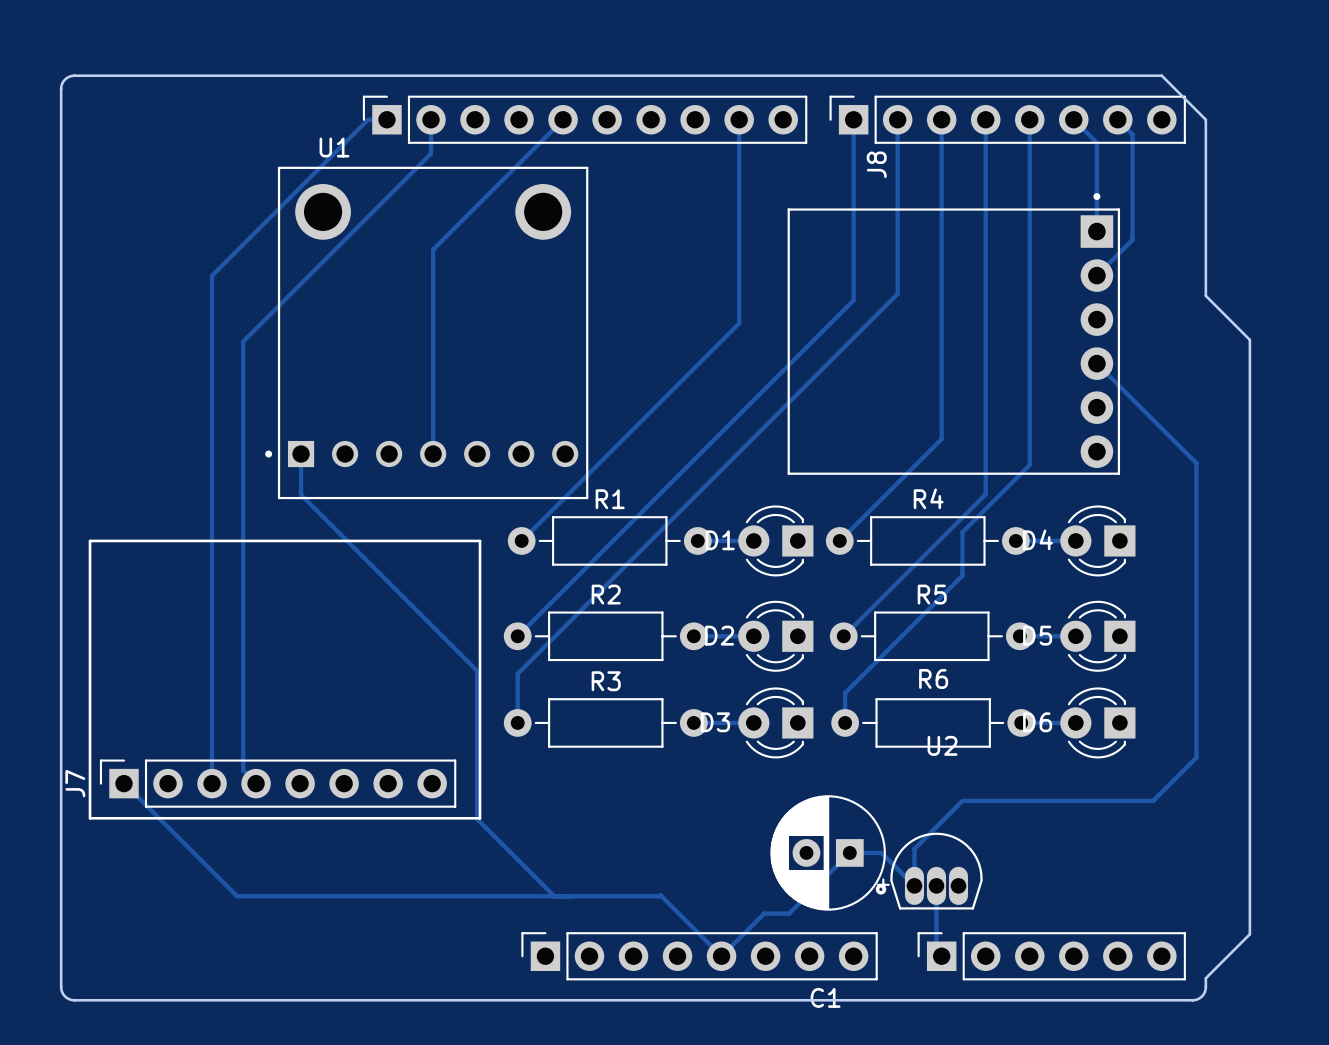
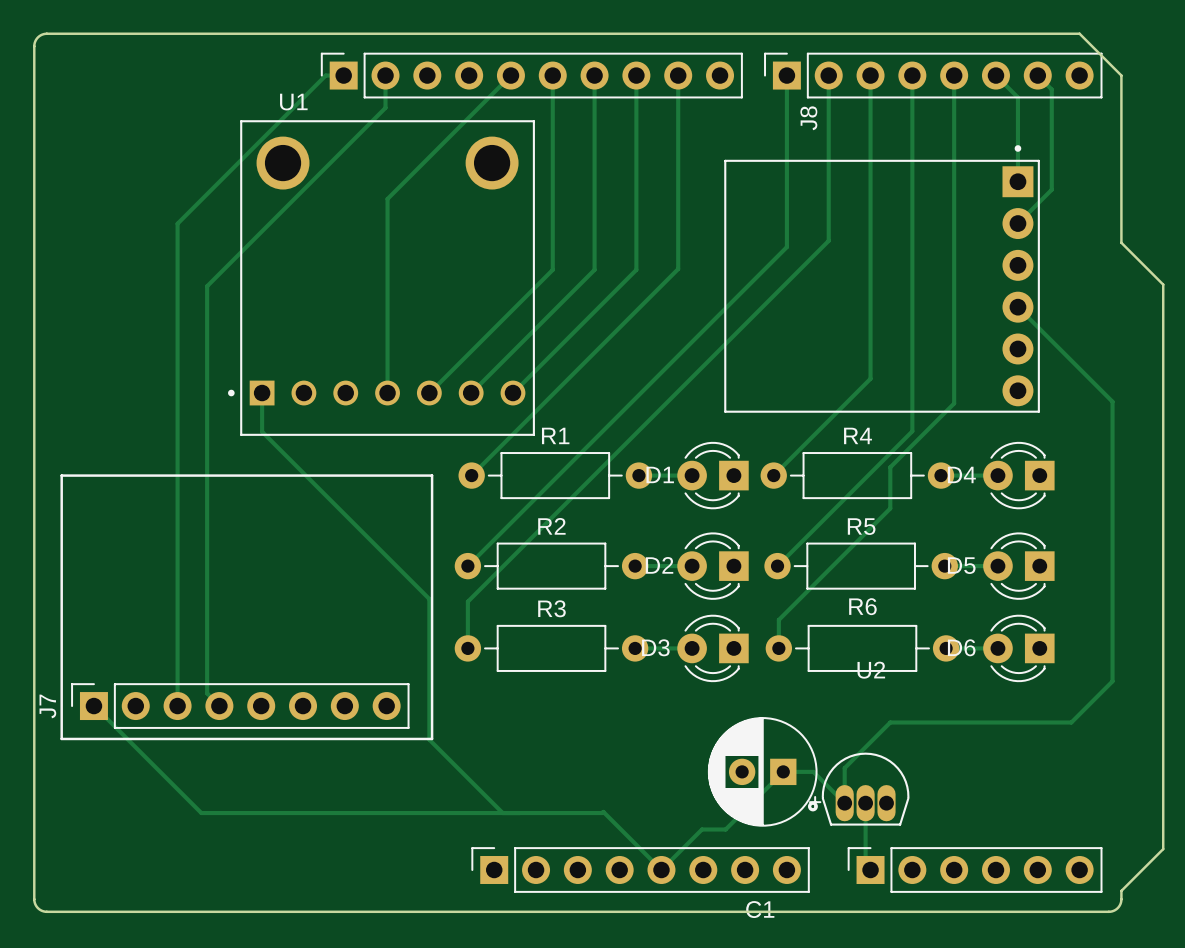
track: none -> (552, 75) (552, 269) (429, 393)
track: none -> (594, 75) (594, 269) (471, 393)
track: none -> (636, 75) (636, 269) (512, 393)

